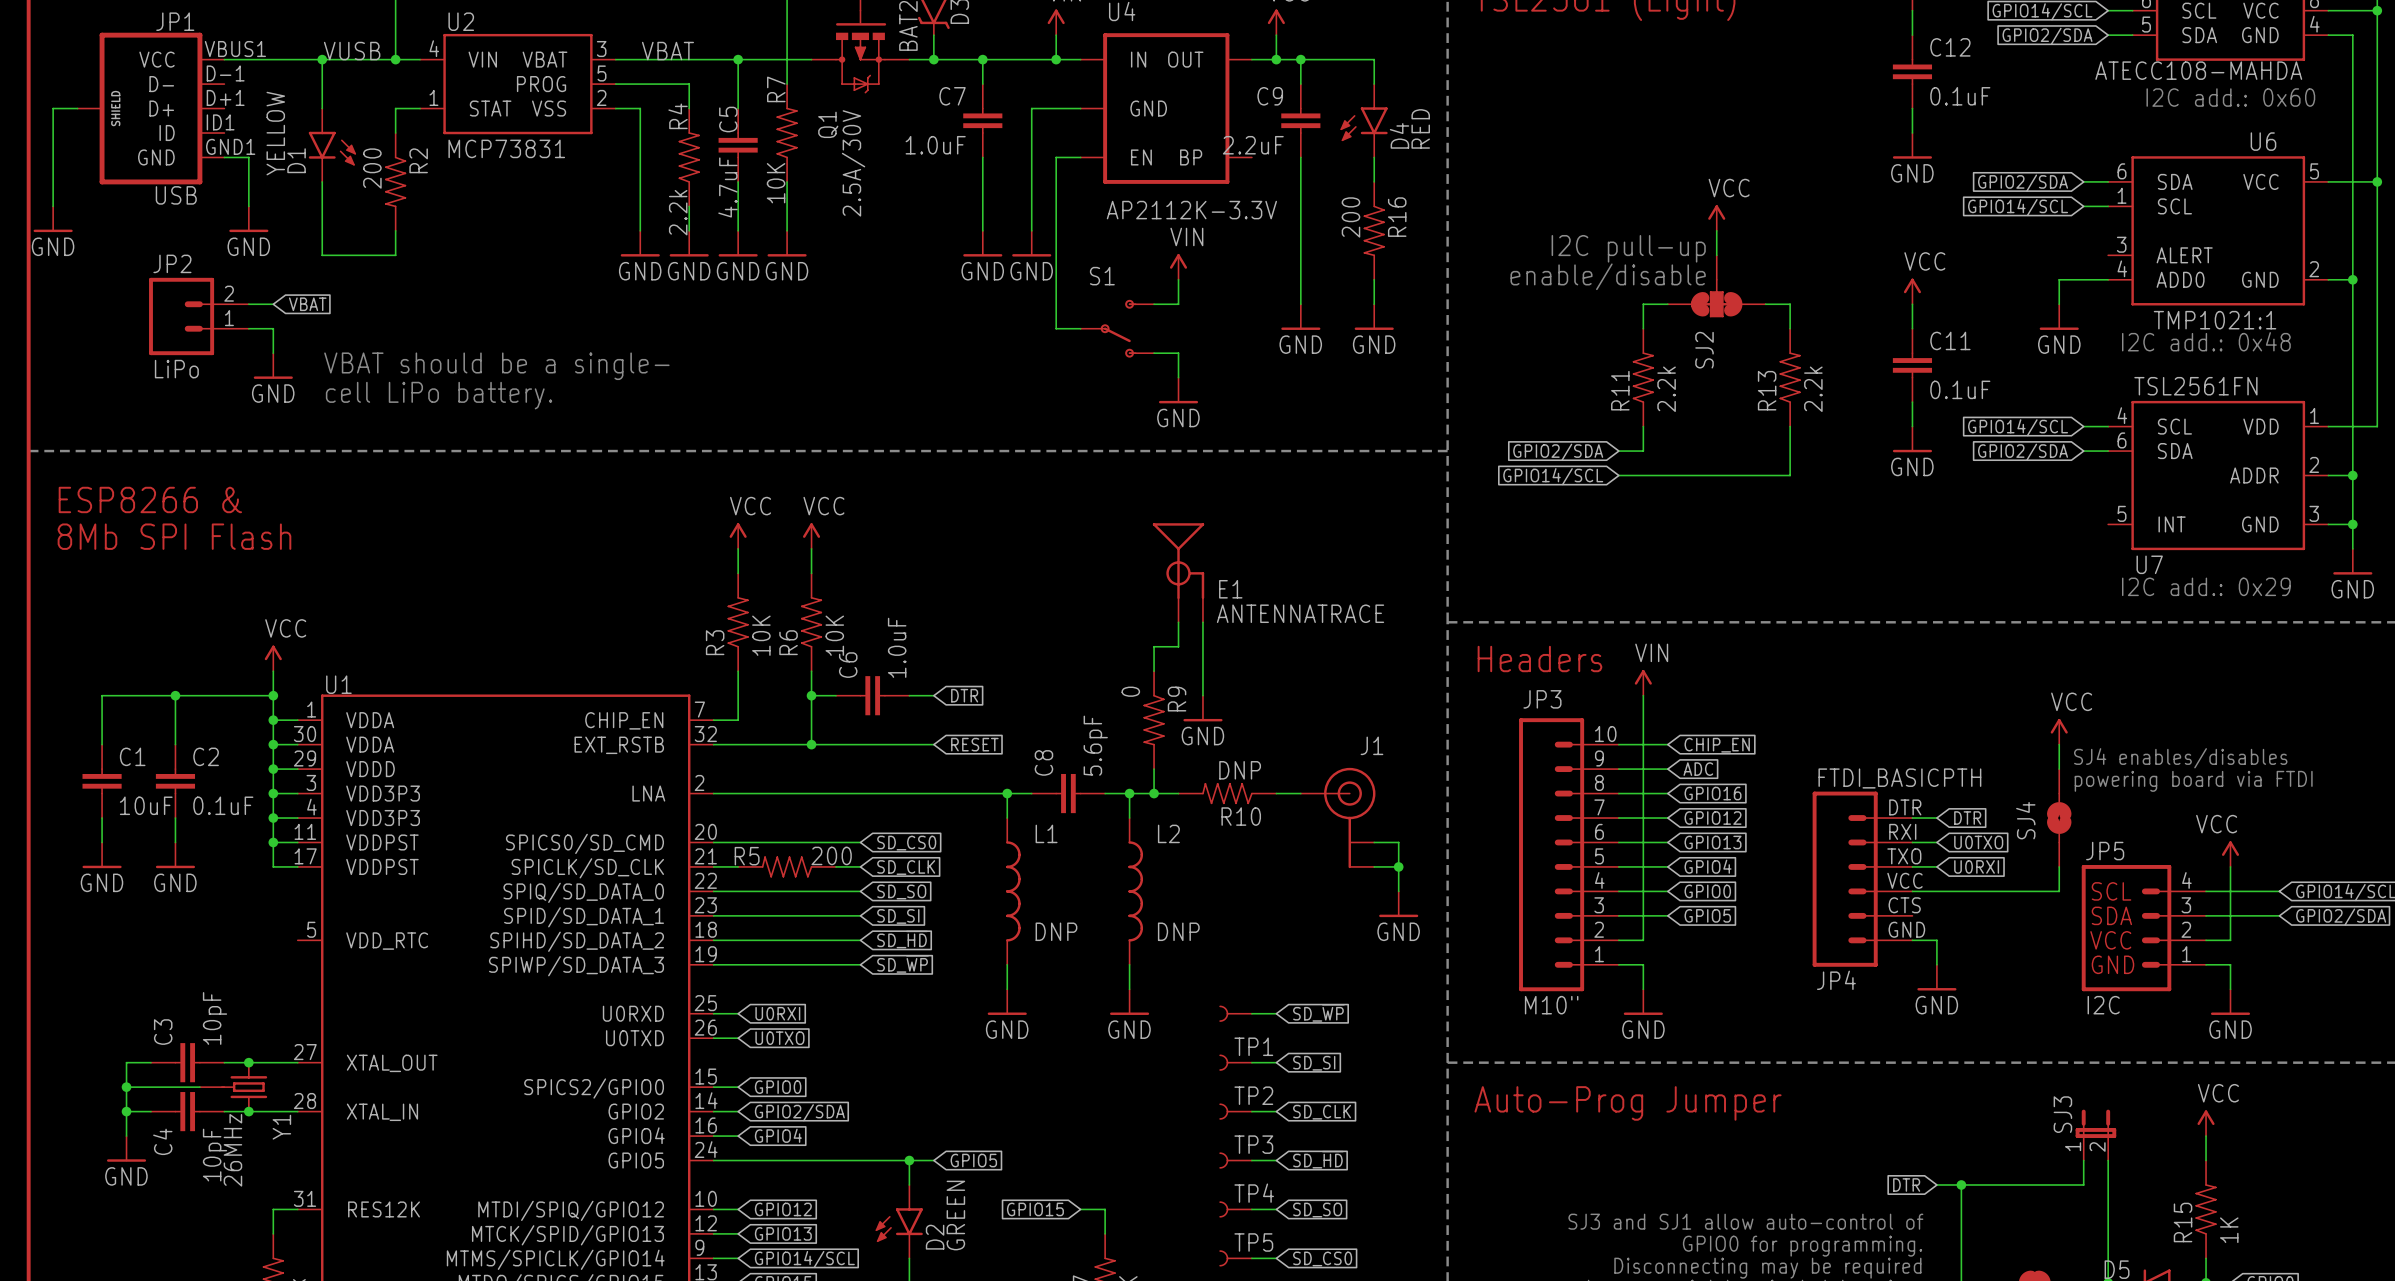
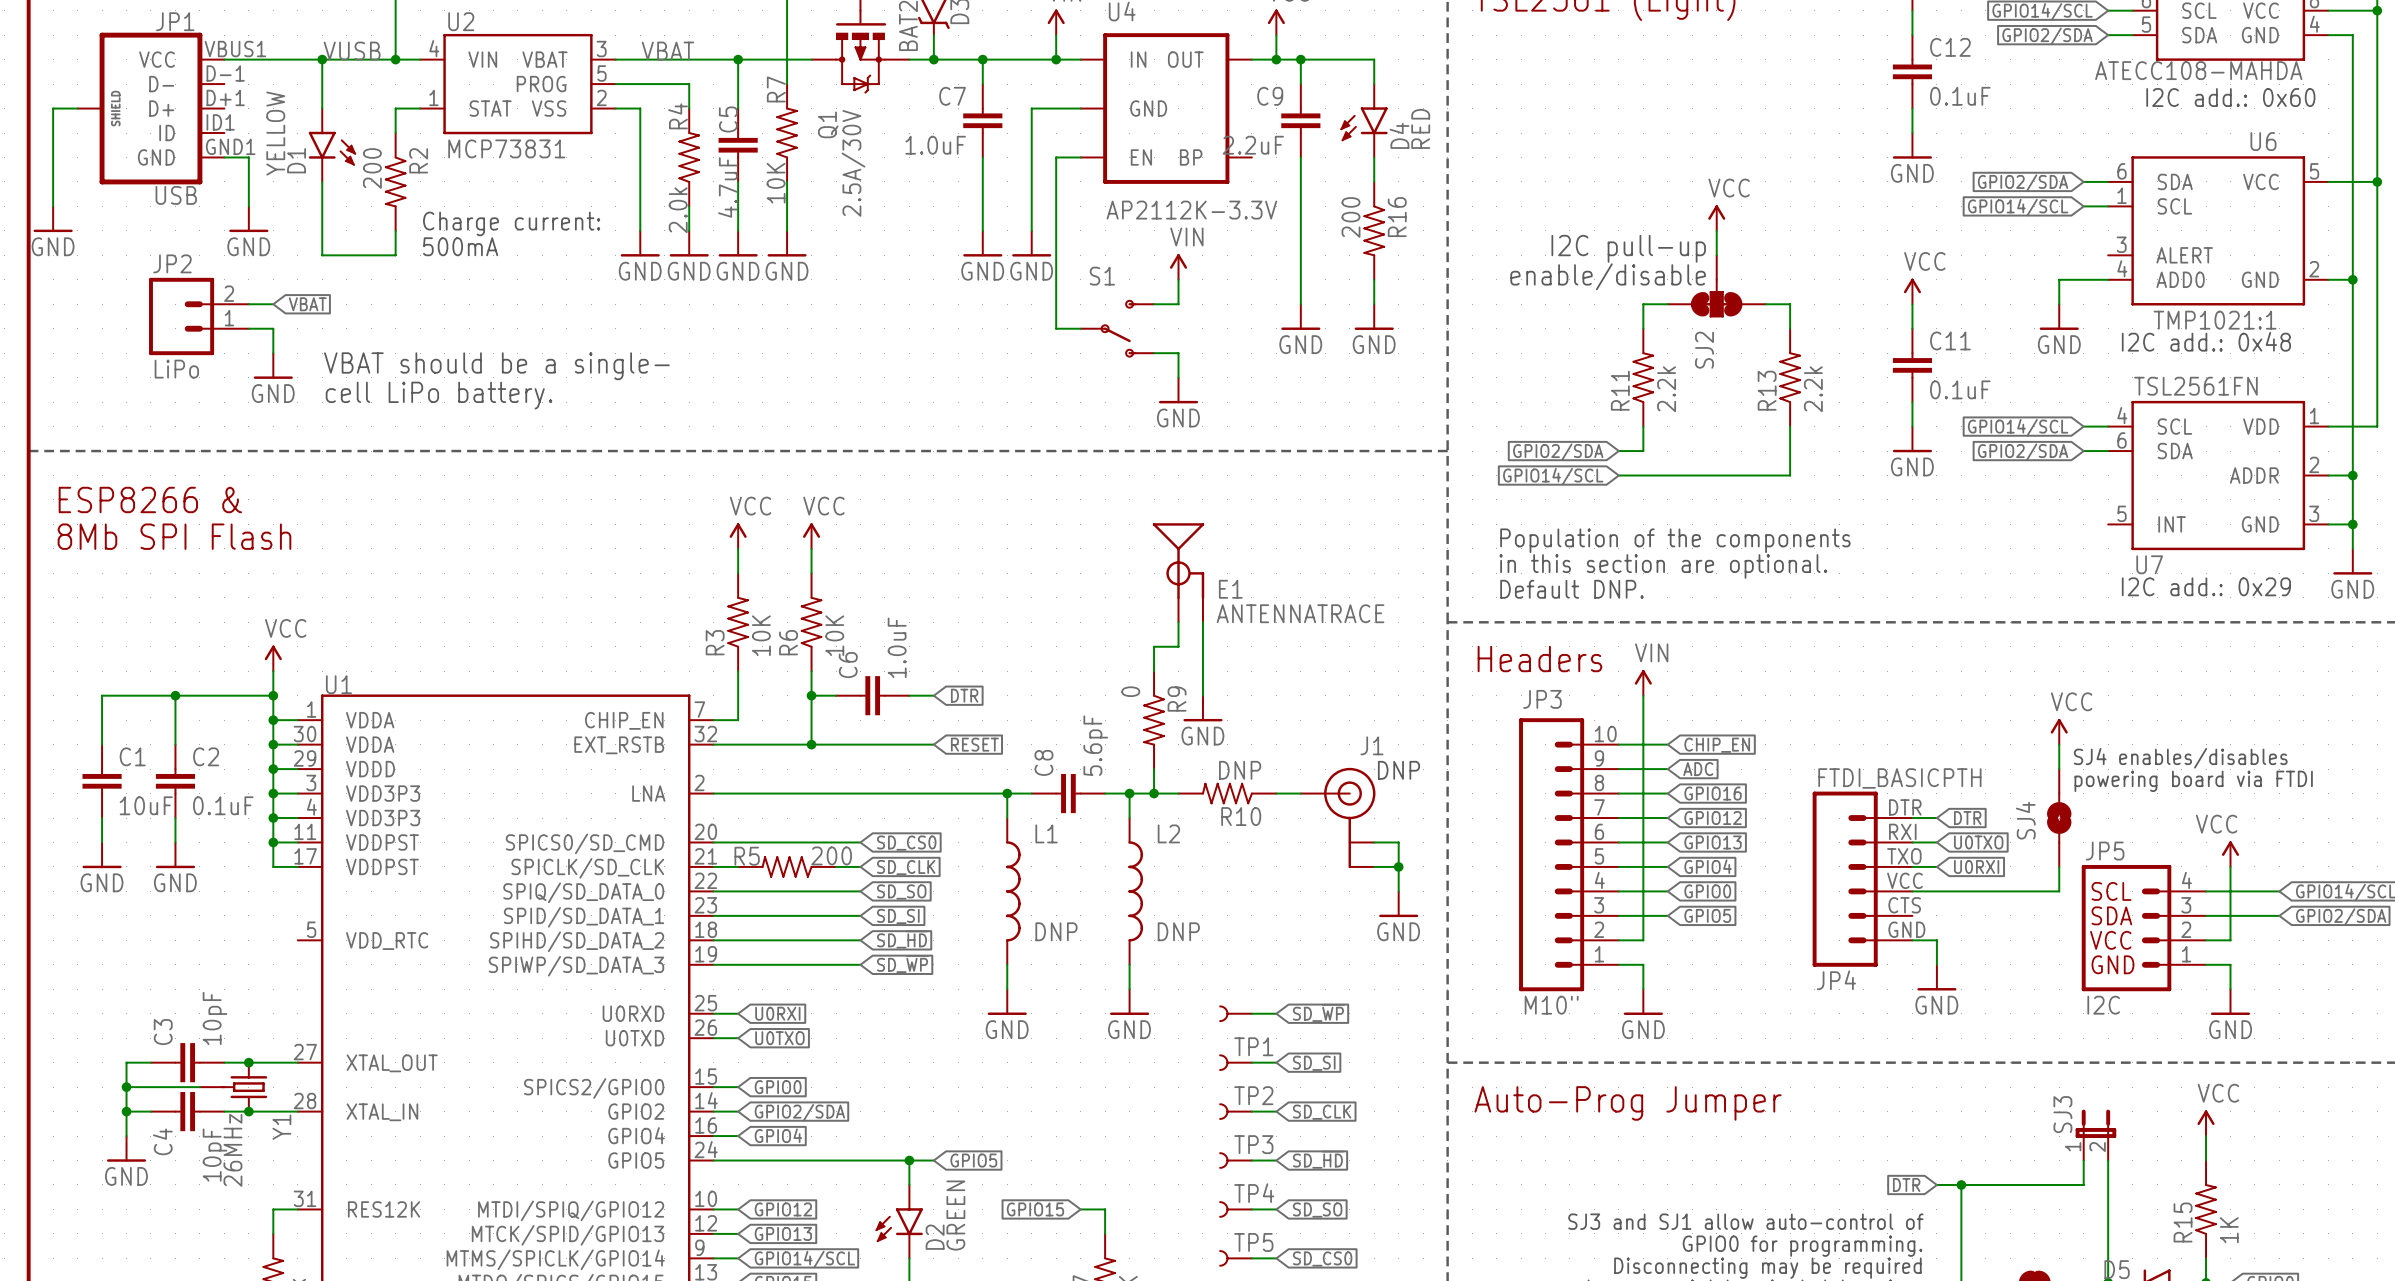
R4 value: 2.2k (678, 212) -> 2.0k (678, 210)
text: none -> Charge current: (511, 223)
text: none -> 500mA (460, 246)
text: none -> Population of the components (1675, 540)
text: none -> in this section are optional. (1663, 566)
text: none -> Default DNP. (1571, 589)
text: none -> DNP (1398, 770)

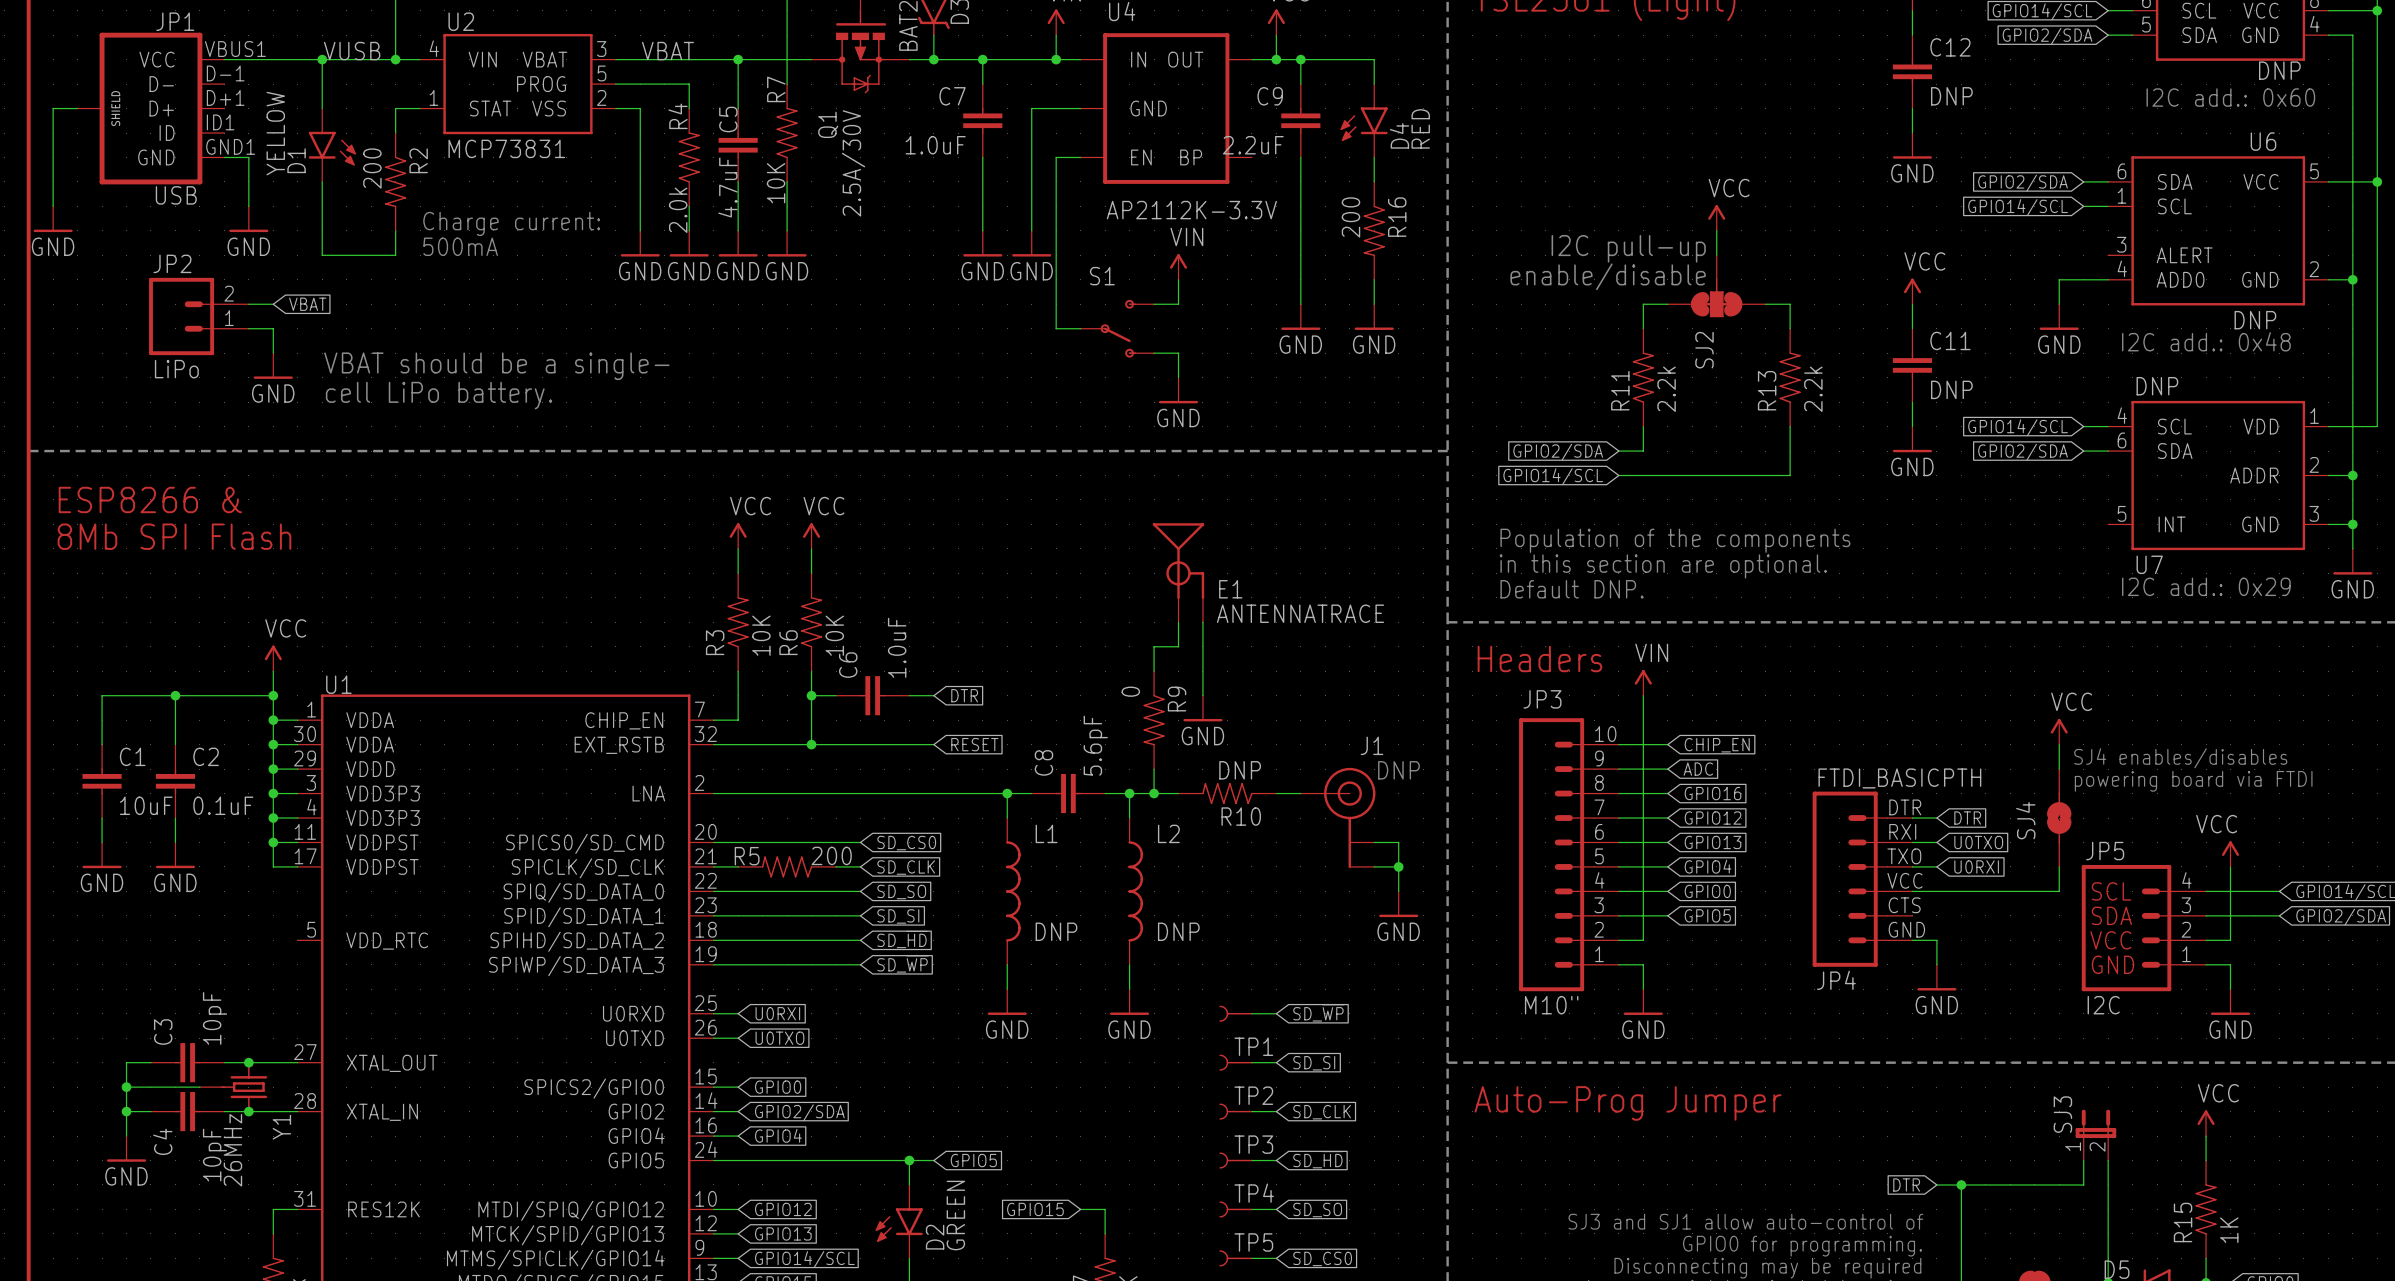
part value: ATECC108-MAHDA (2198, 70) -> DNP (2279, 70)
C12 value: 0.1uF (1960, 96) -> DNP (1951, 96)
U6 value: TMP1021:1 (2215, 320) -> DNP (2255, 320)
U7 value: TSL2561FN (2195, 386) -> DNP (2157, 386)
C11 value: 0.1uF (1960, 389) -> DNP (1951, 389)

